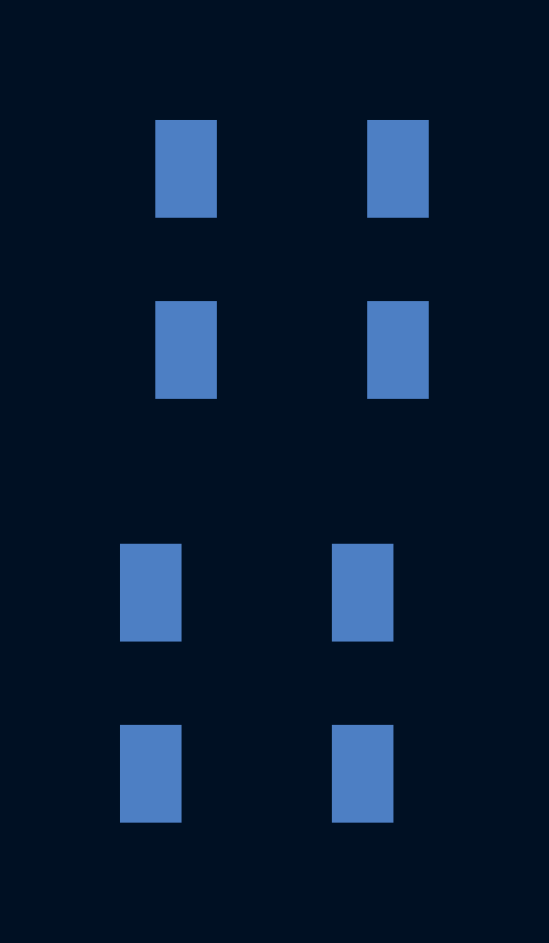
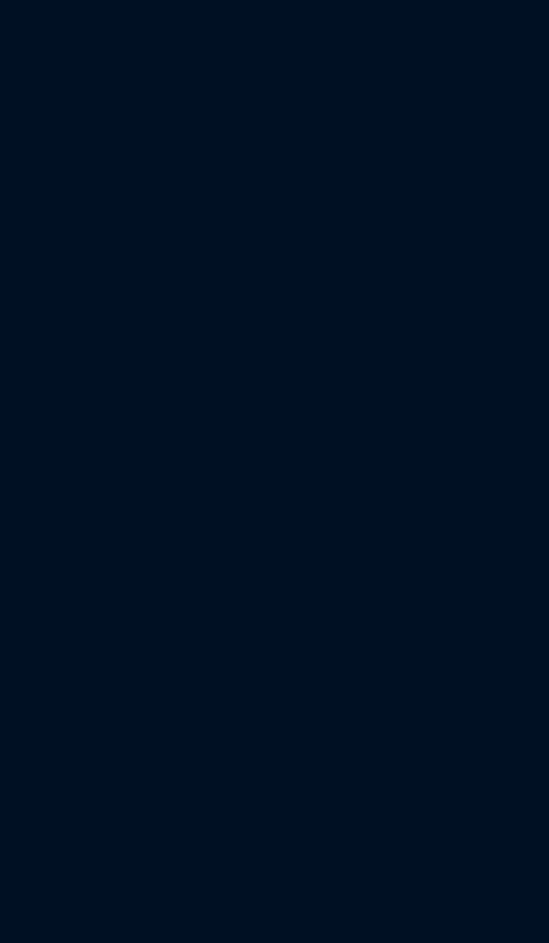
part: (186, 259) -> none
part: (397, 259) -> none
part: (150, 683) -> none
part: (362, 683) -> none

